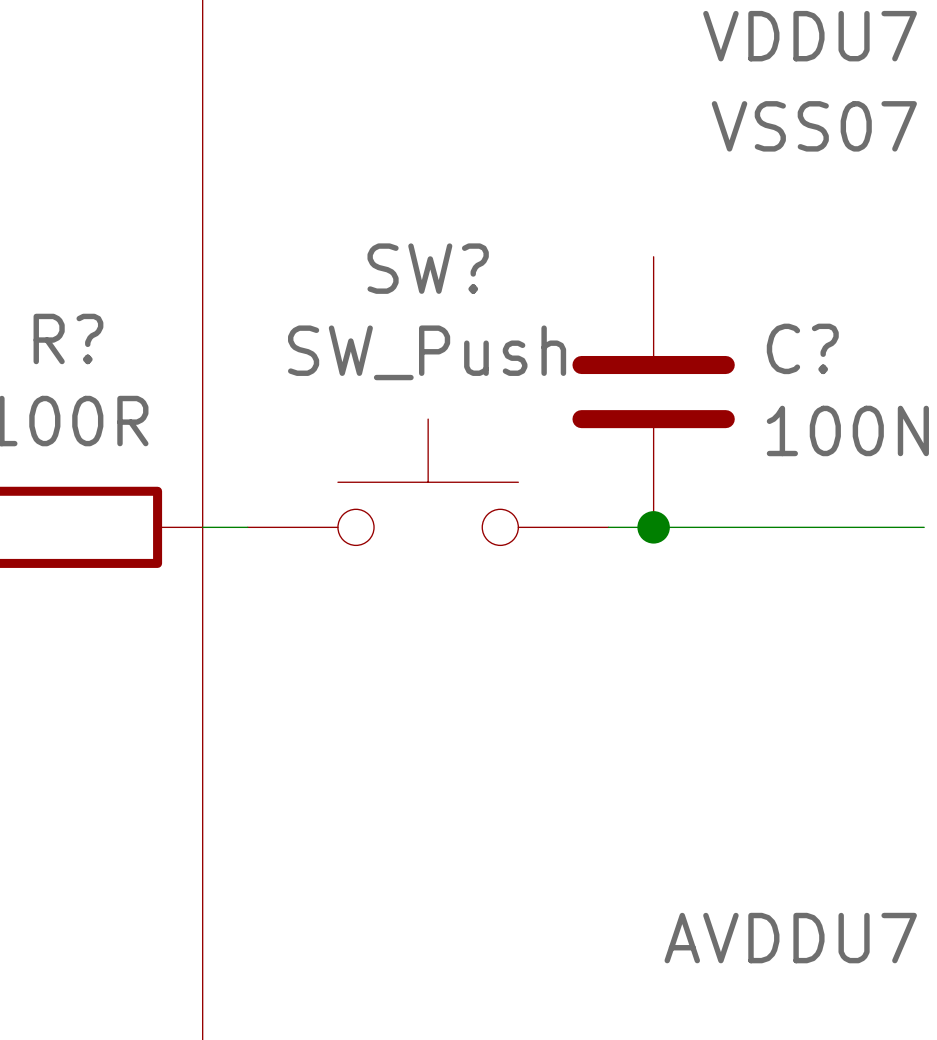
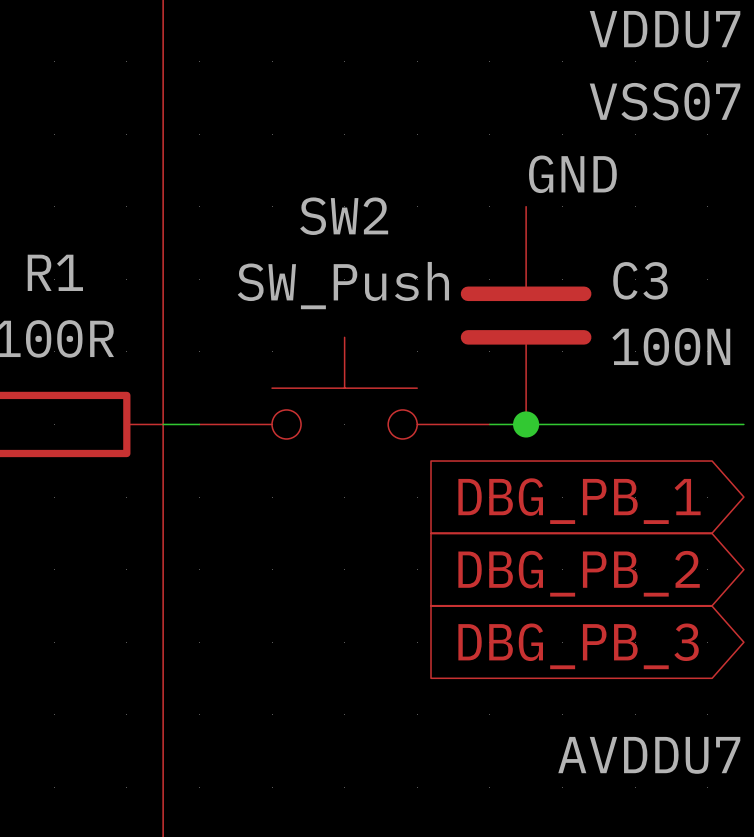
label: none -> GND (572, 174)
SW? name: SW? (428, 268) -> SW2 (344, 216)
R? name: R? (68, 338) -> R1 (55, 272)
C? name: C? (802, 348) -> C3 (640, 280)
global label: none -> DBG_PB_1 (579, 501)
global label: none -> DBG_PB_2 (579, 573)
global label: none -> DBG_PB_3 (578, 646)

